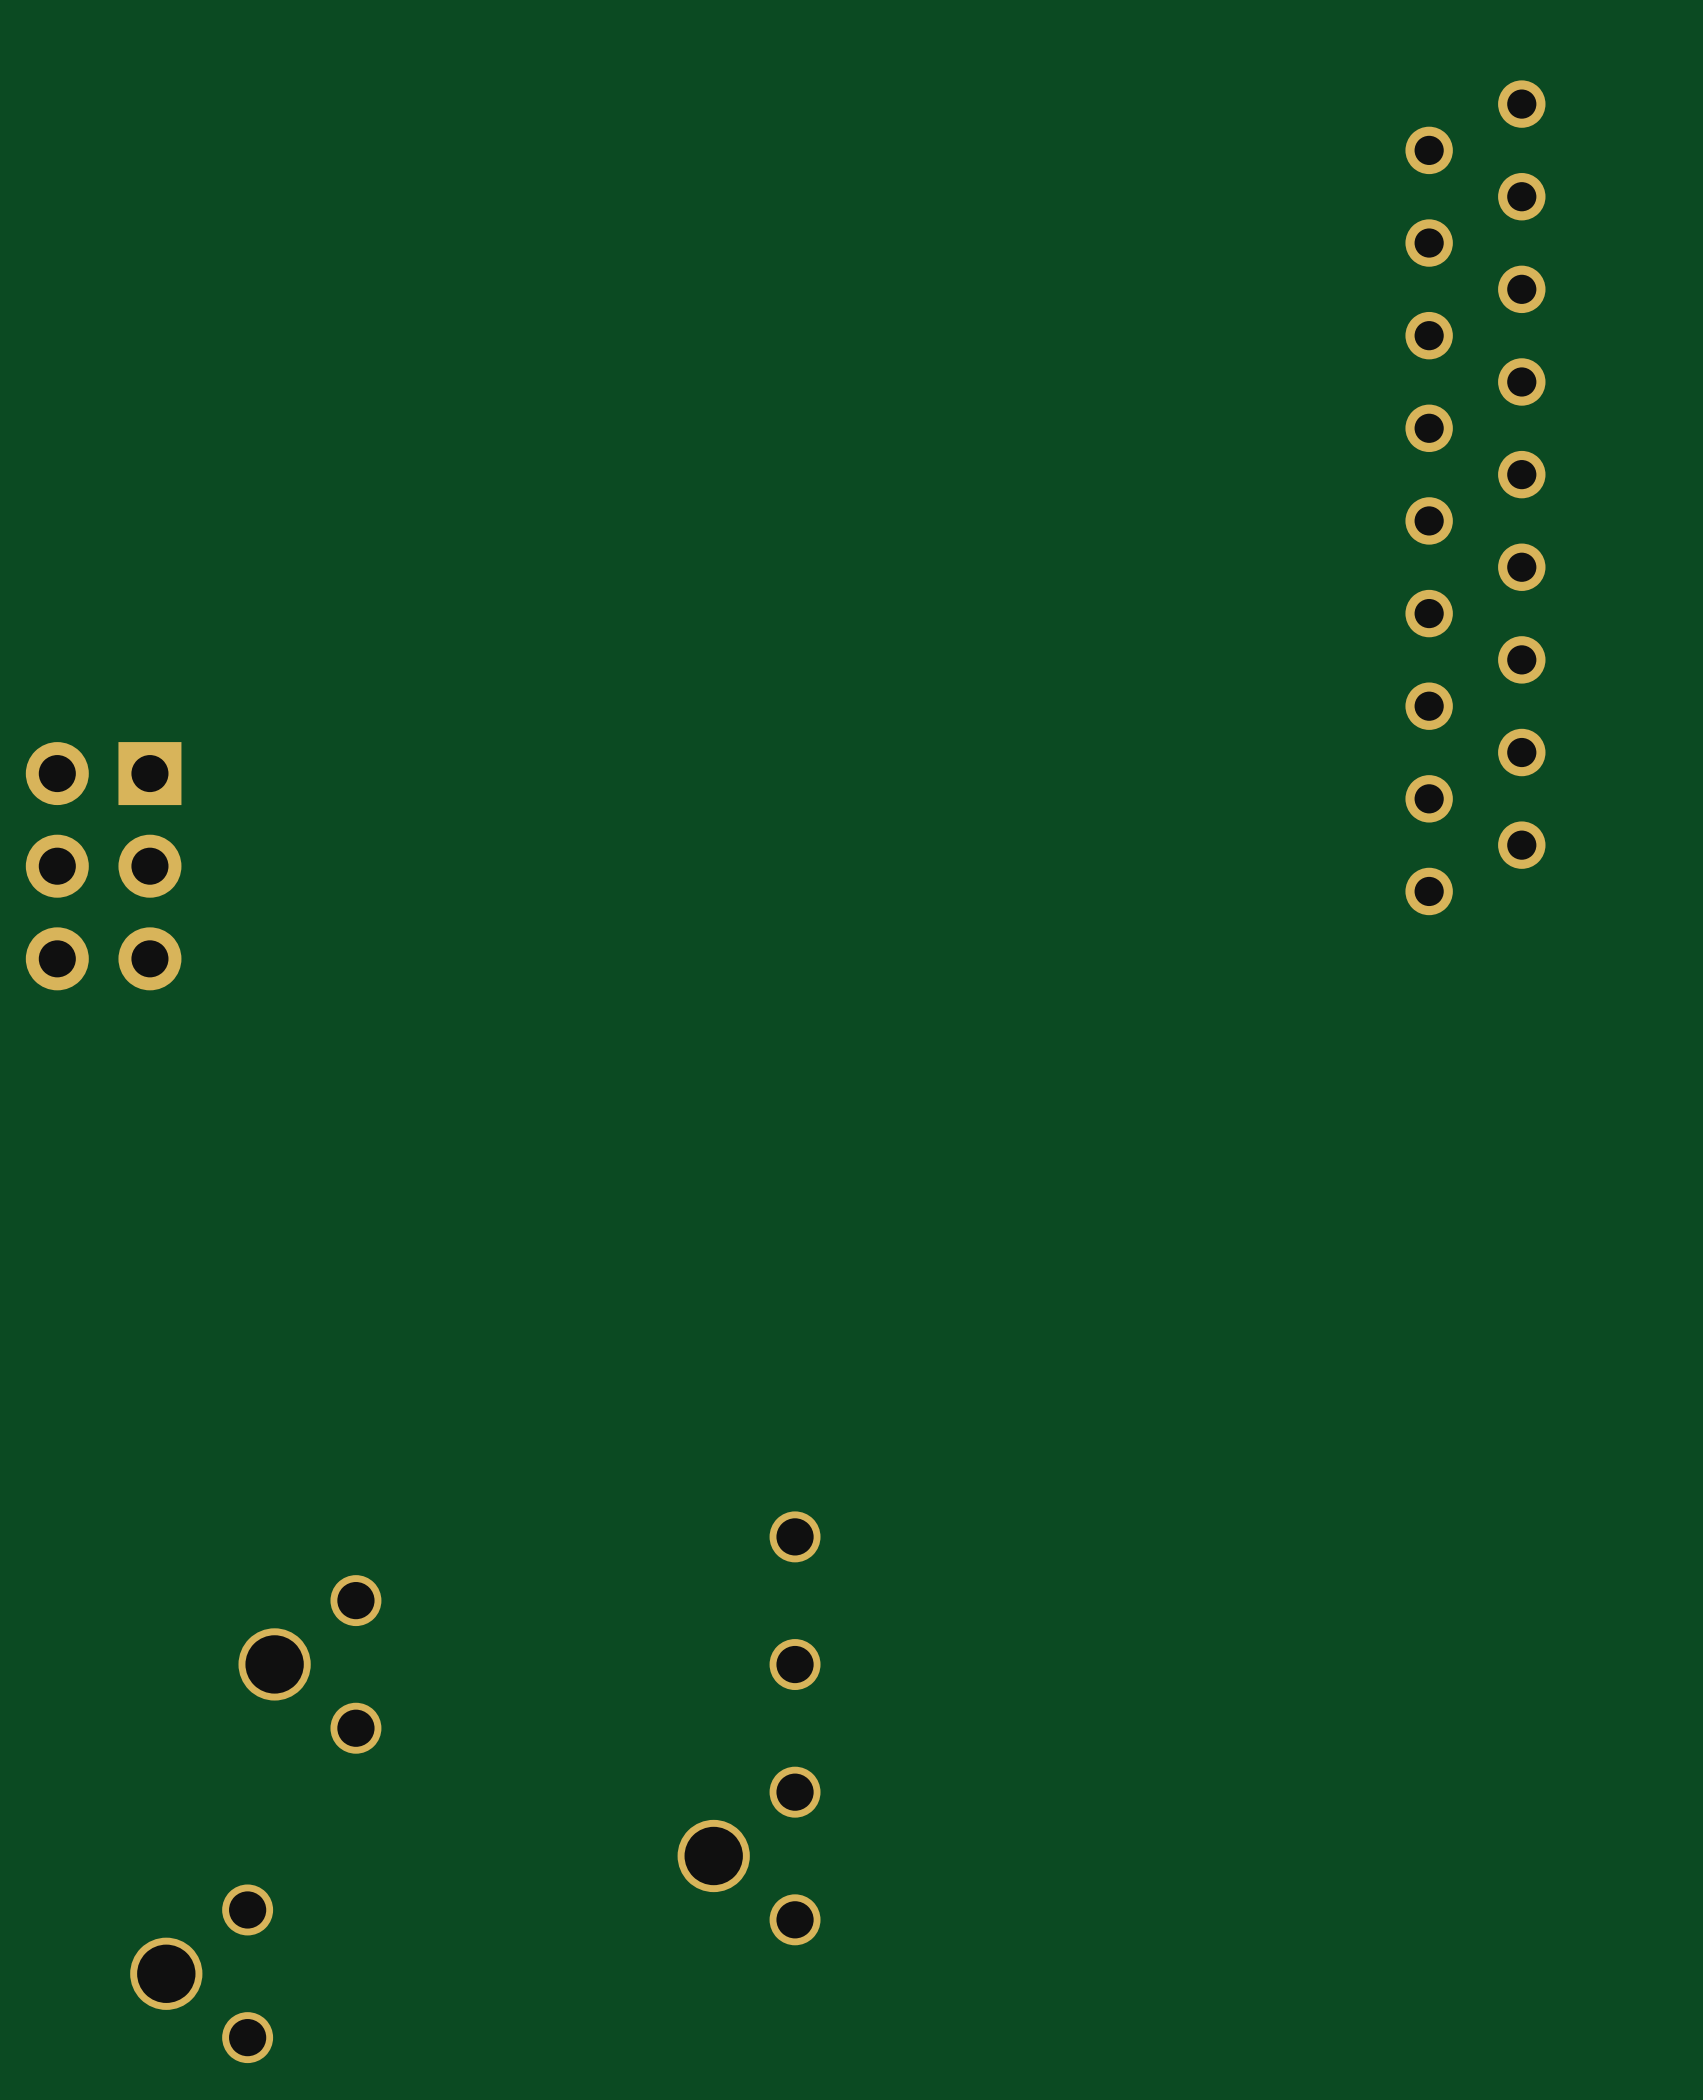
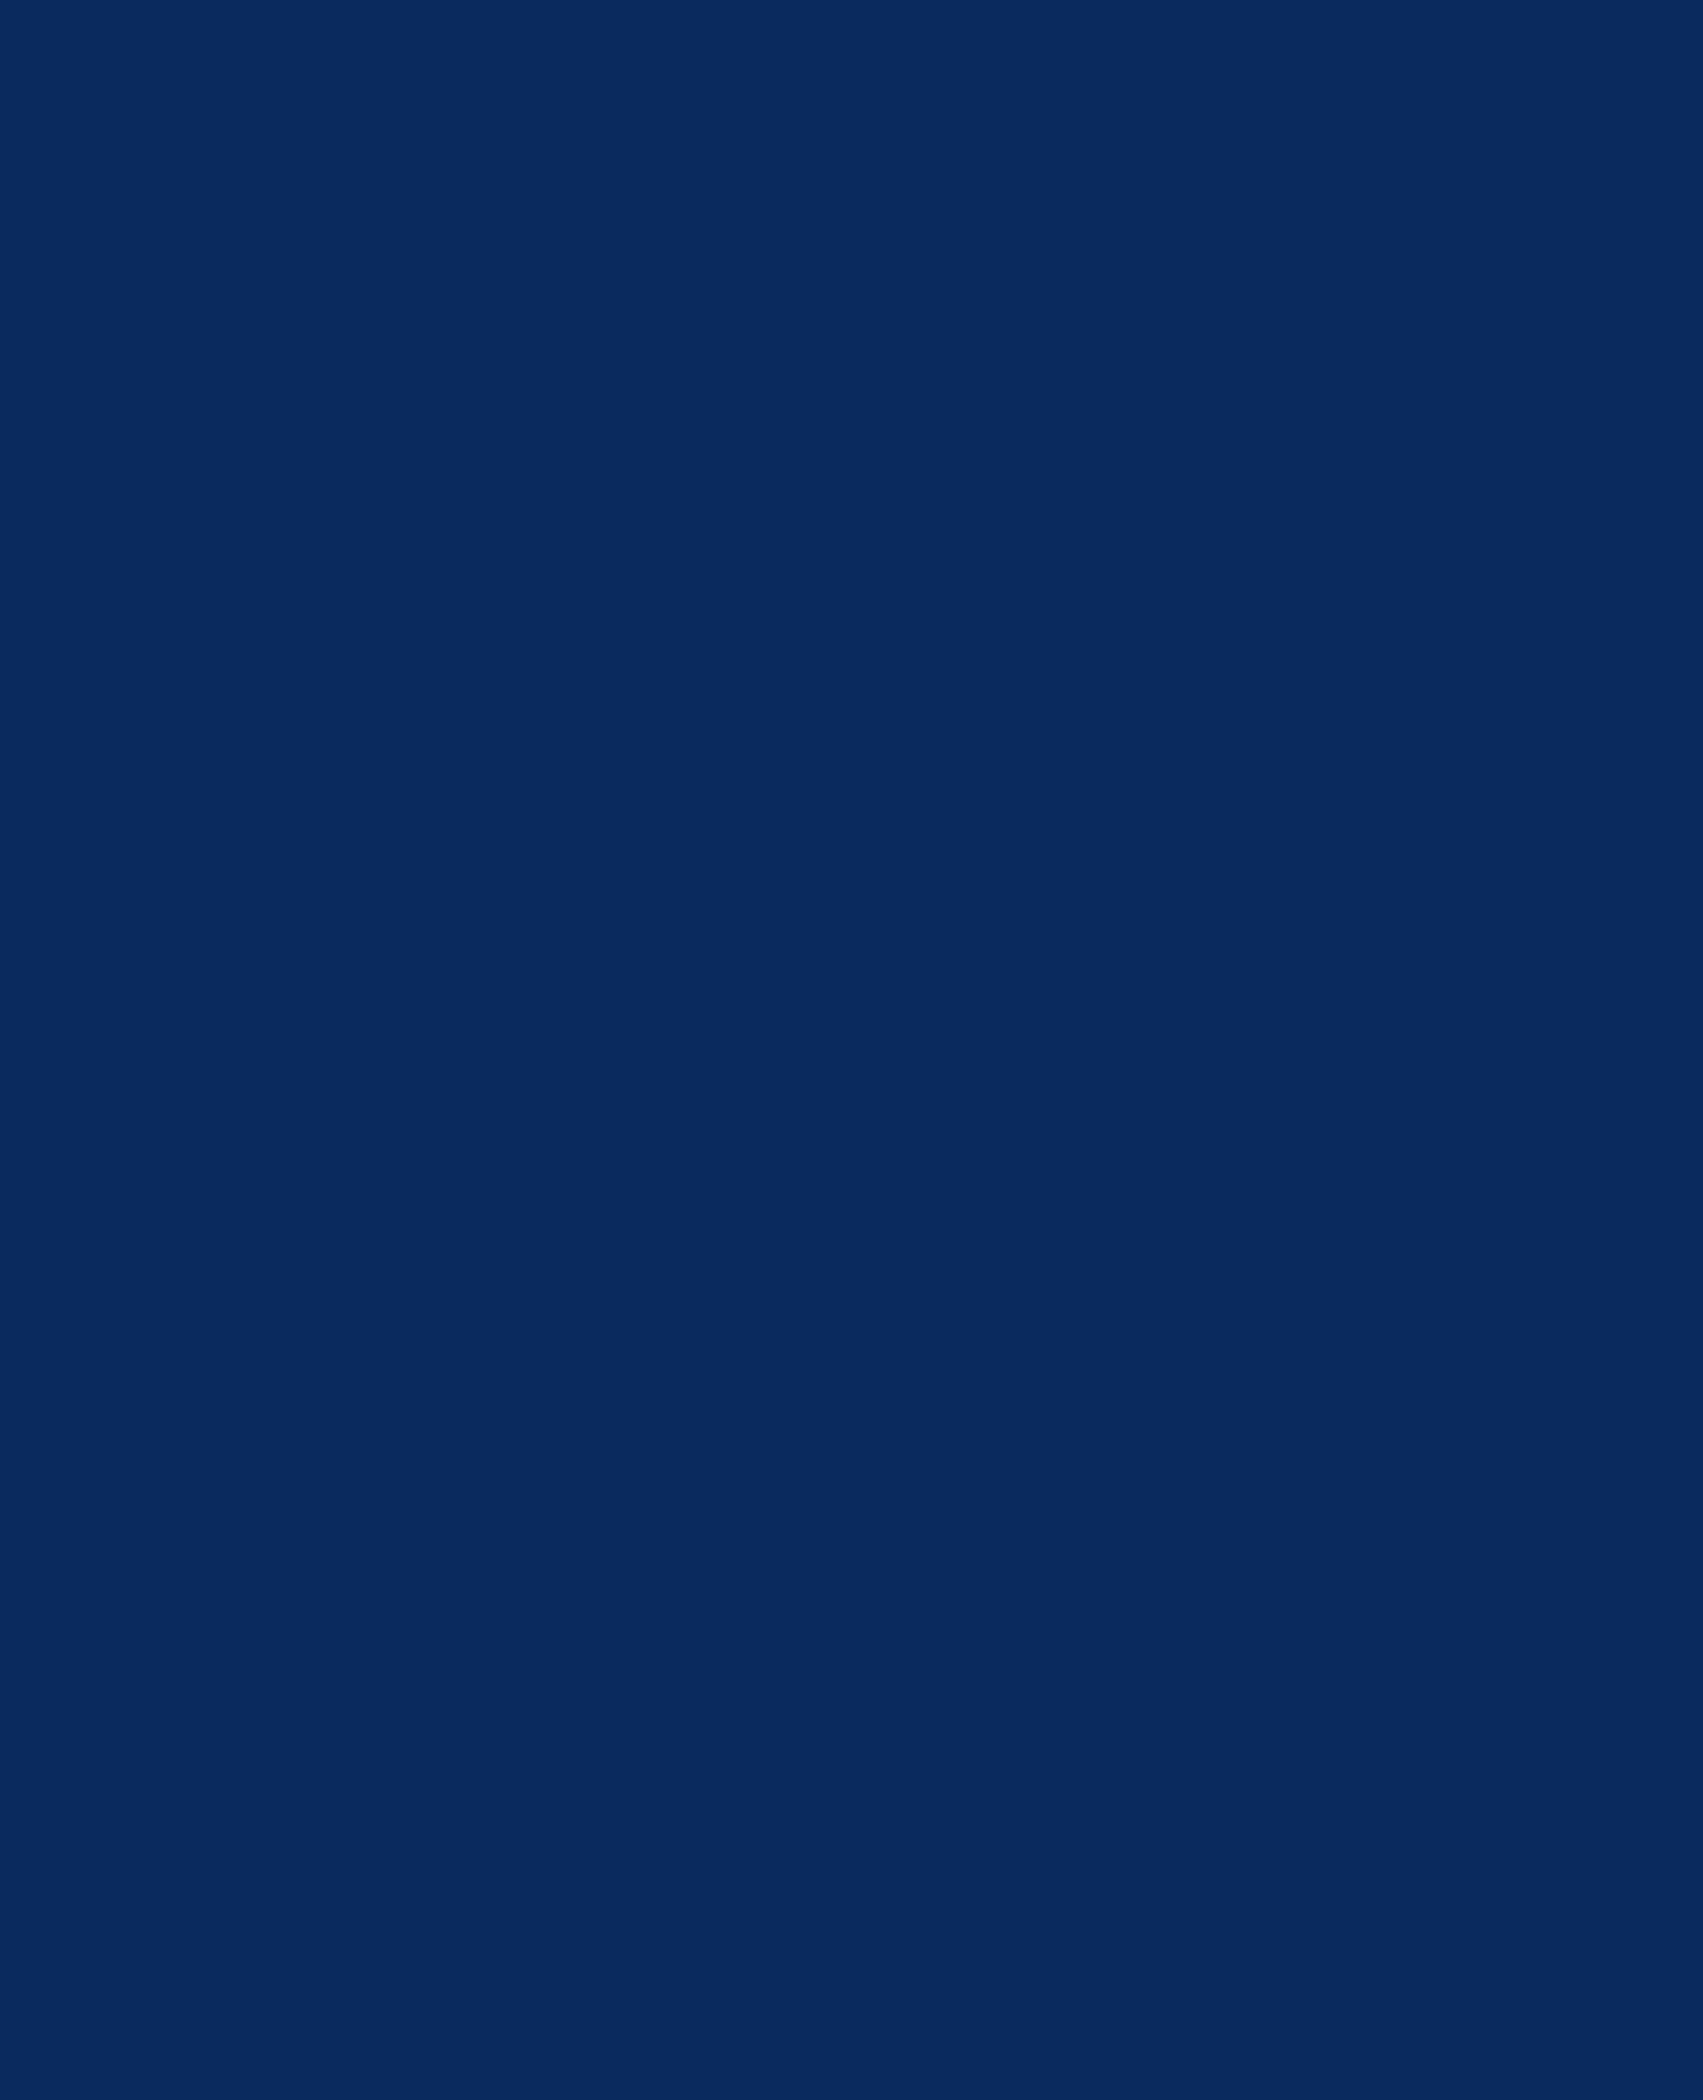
part: (1475, 497) -> none
part: (103, 866) -> none
part: (309, 1664) -> none
part: (749, 1728) -> none
part: (201, 1973) -> none

